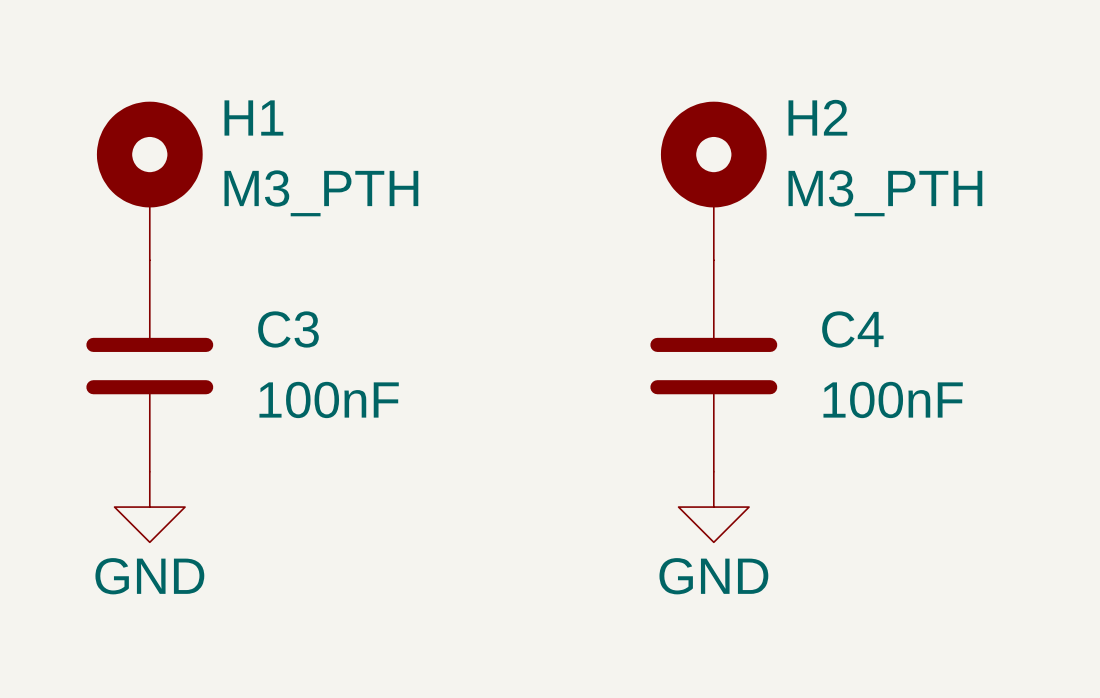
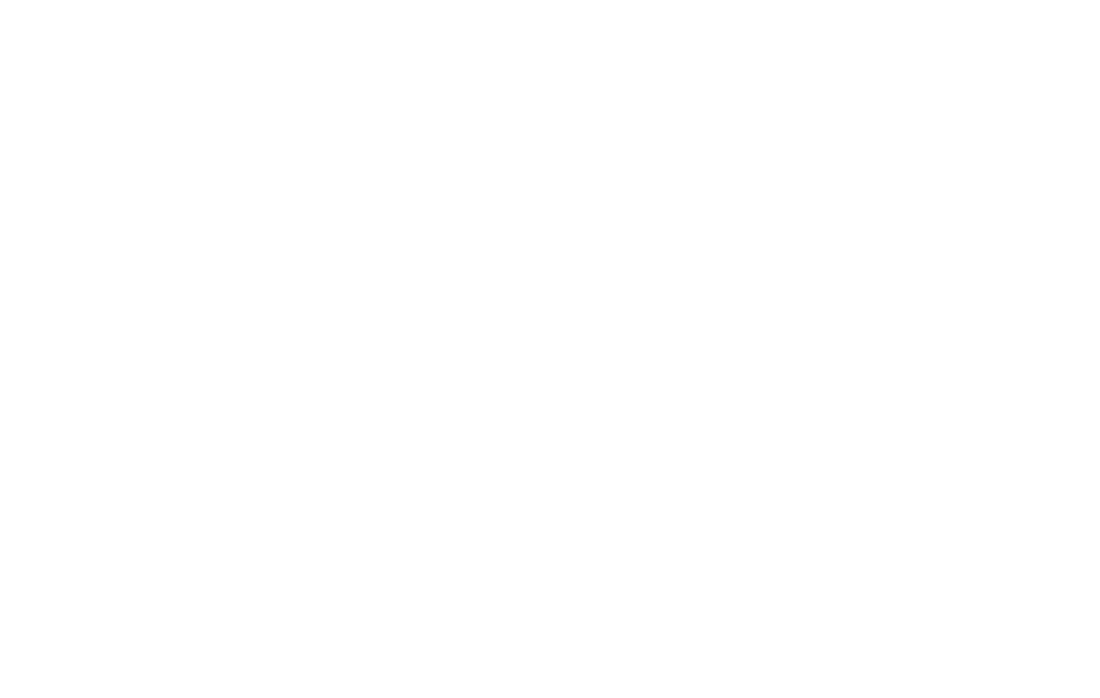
H1: M3_PTH (149, 180) -> none
H2: M3_PTH (713, 180) -> none
C3: 100nF (149, 366) -> none
C4: 100nF (713, 366) -> none
power symbol: GND (149, 507) -> none
power symbol: GND (713, 507) -> none

